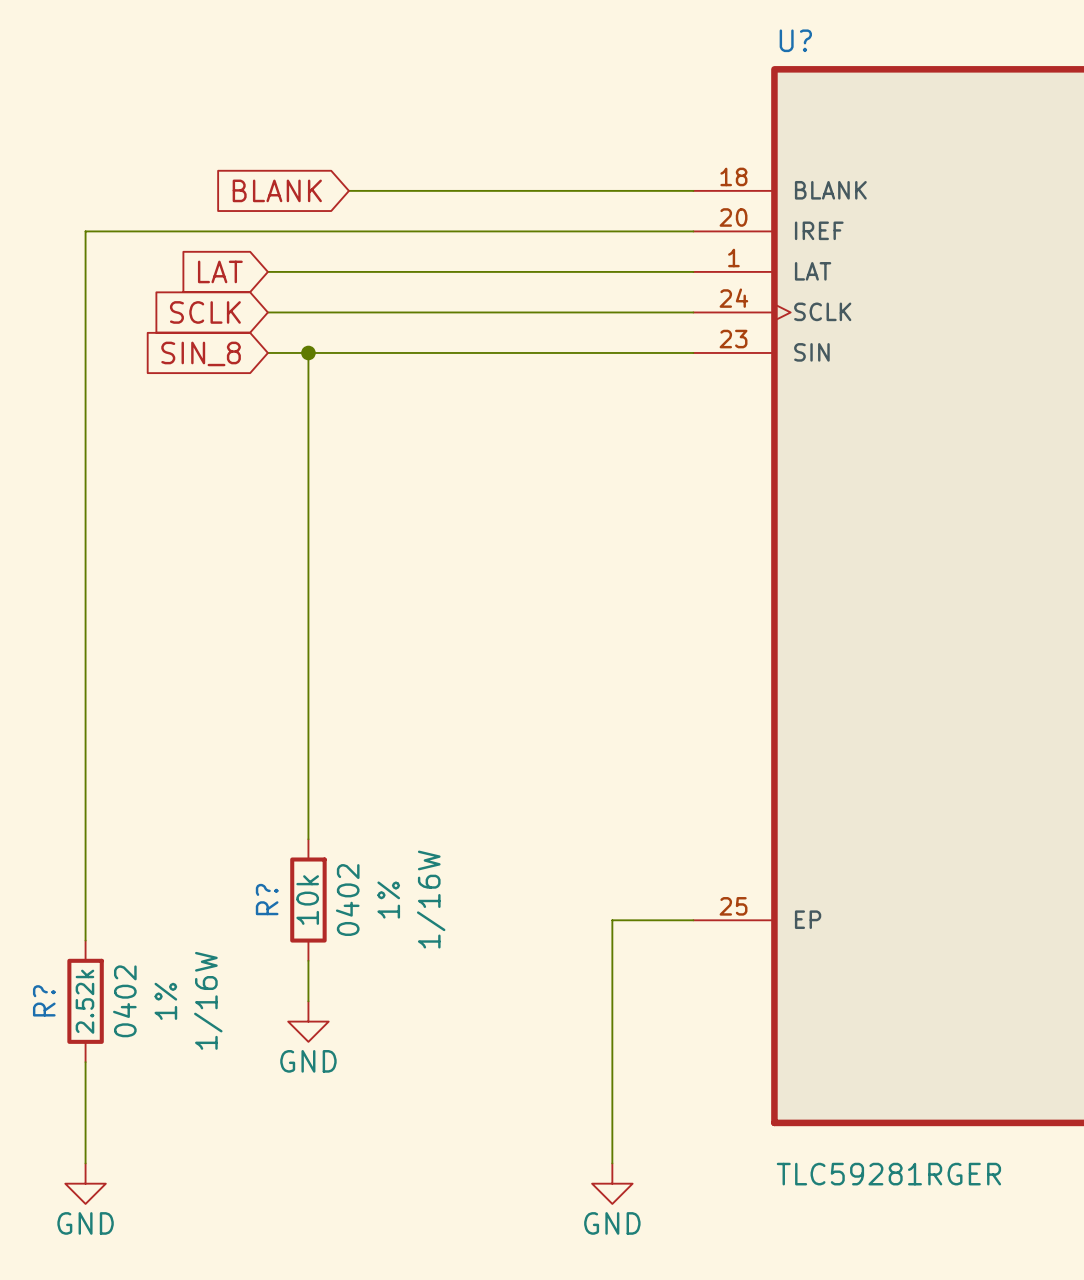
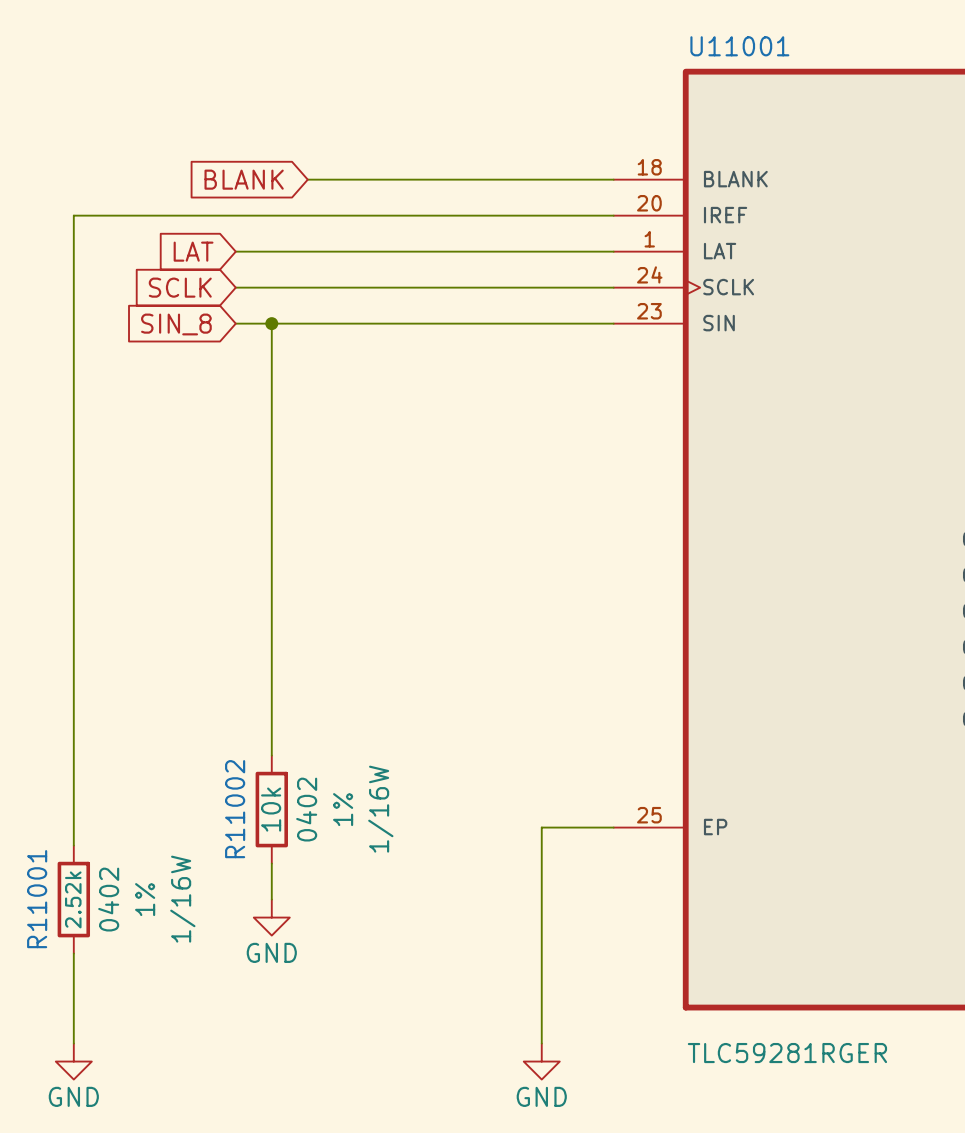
U? name: U? (795, 40) -> U11001 (739, 46)
R? name: R? (267, 899) -> R11002 (235, 809)
R? name: R? (44, 1000) -> R11001 (37, 899)

